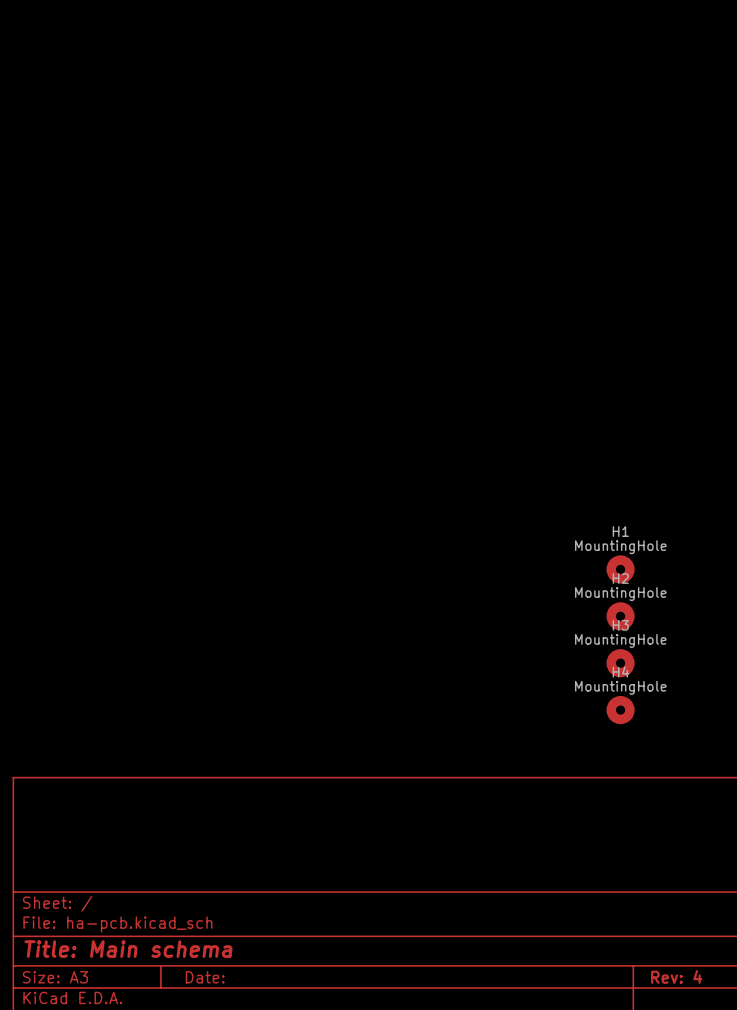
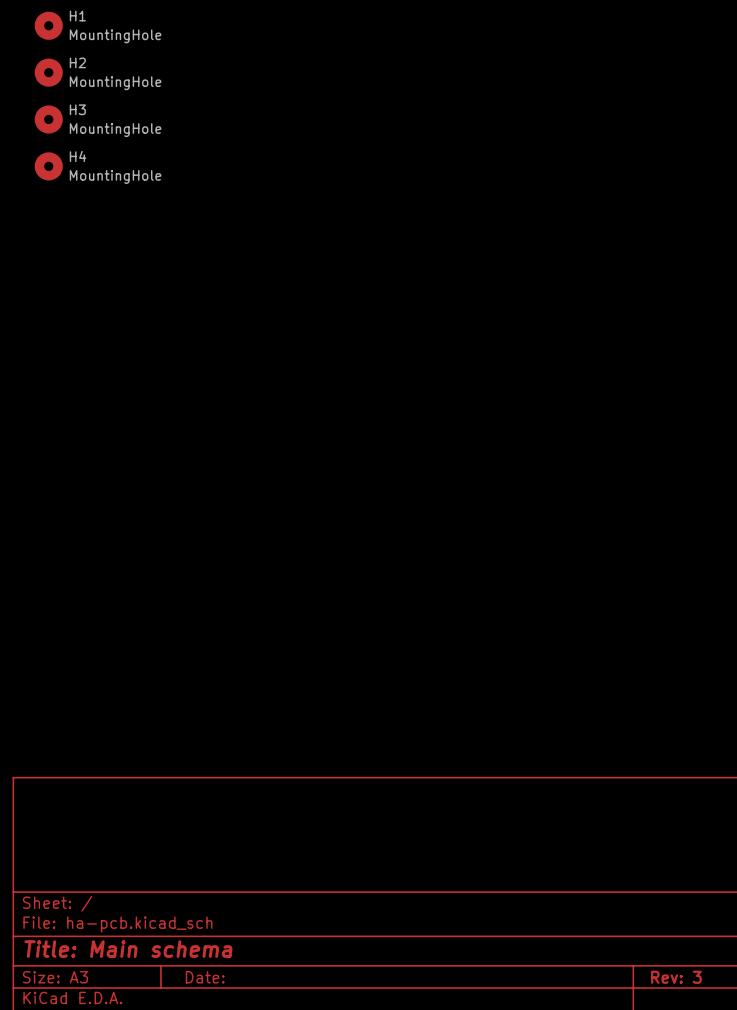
H1 name position: H1 (620, 531) -> H1 (77, 16)
H1 value position: MountingHole (620, 547) -> MountingHole (115, 36)
H1 position: (620, 569) -> (48, 25)
H2 name position: H2 (620, 578) -> H2 (77, 62)
H2 value position: MountingHole (620, 594) -> MountingHole (115, 83)
H2 position: (620, 616) -> (48, 72)
H3 name position: H3 (620, 625) -> H3 (77, 109)
H3 value position: MountingHole (620, 640) -> MountingHole (115, 130)
H3 position: (620, 663) -> (48, 119)
H4 name position: H4 (621, 671) -> H4 (78, 156)
H4 value position: MountingHole (620, 687) -> MountingHole (115, 176)
H4 position: (620, 710) -> (48, 166)
title block: Rev: 4 (676, 977) -> Rev: 3 (676, 977)

